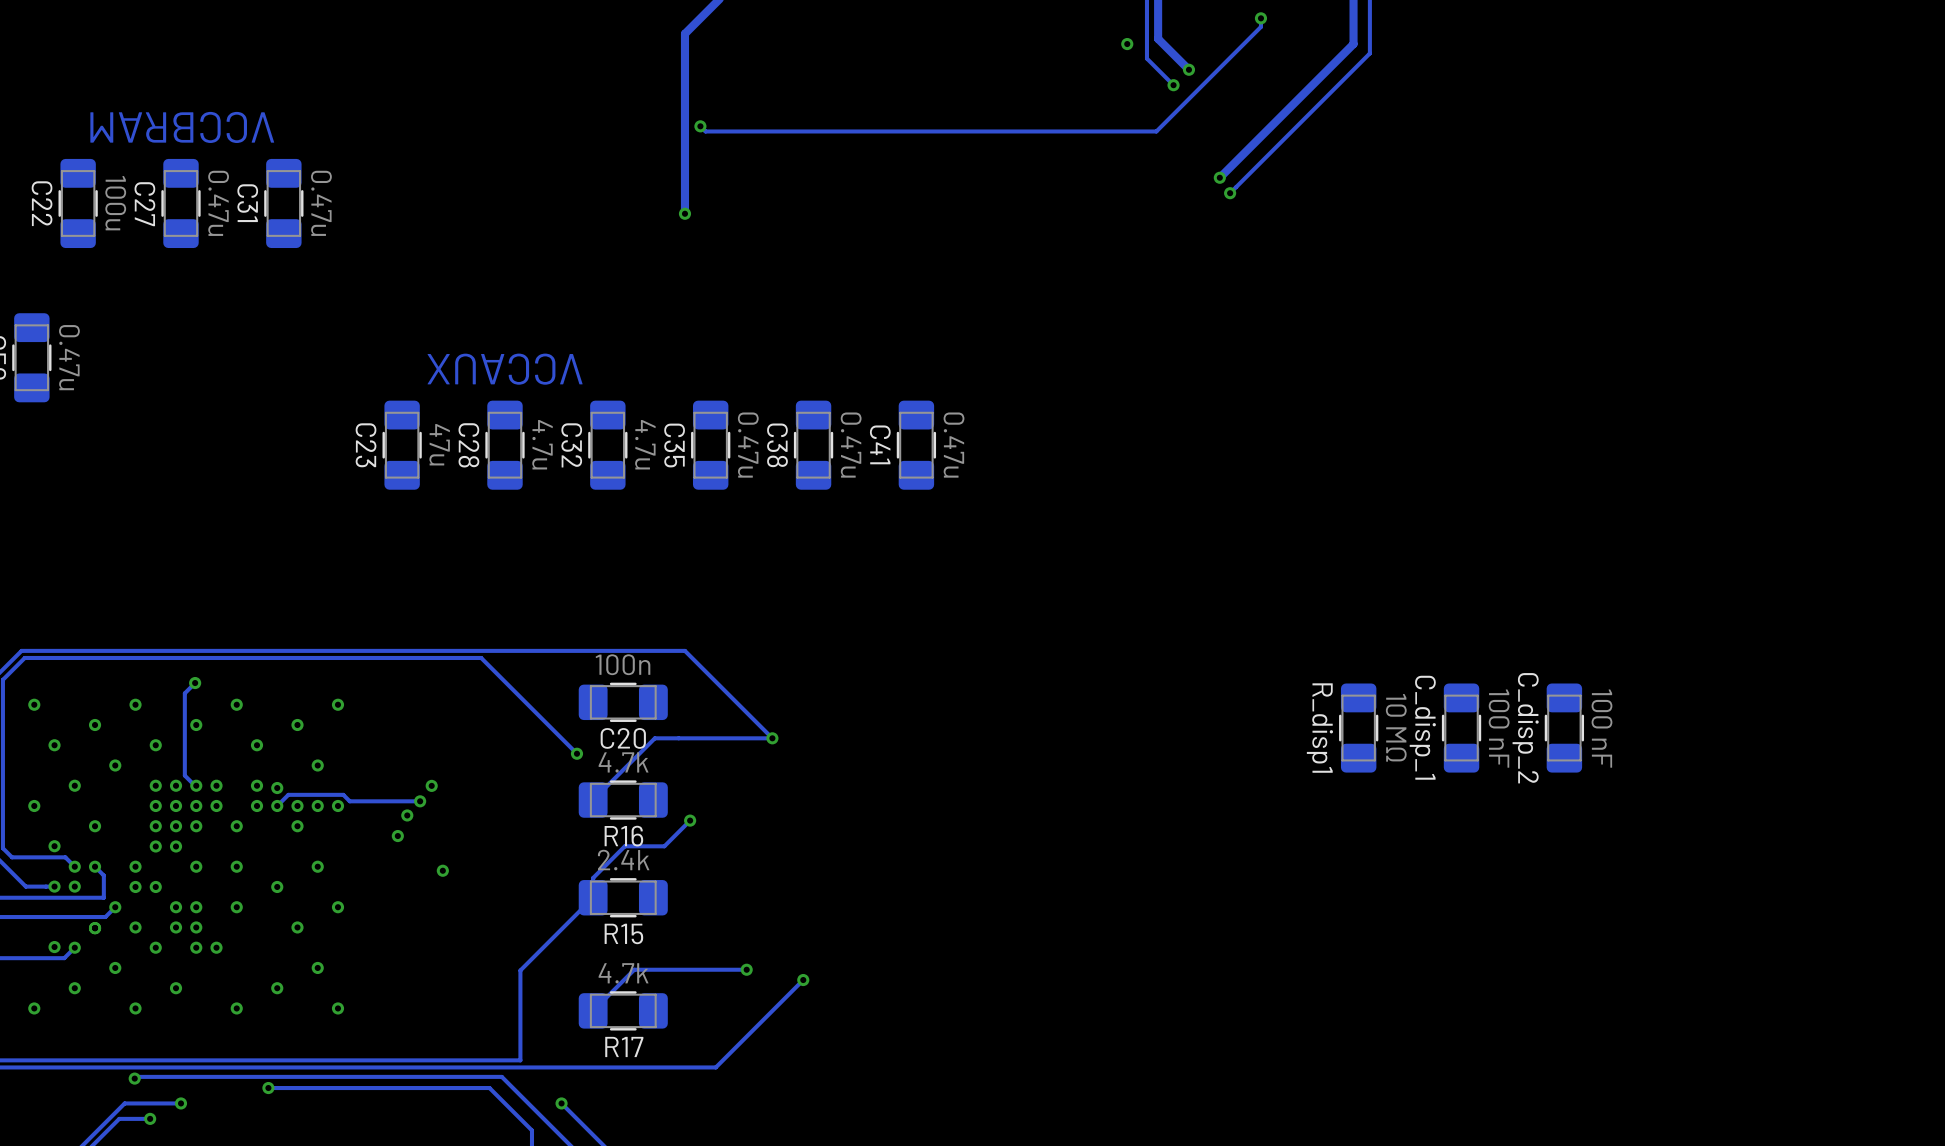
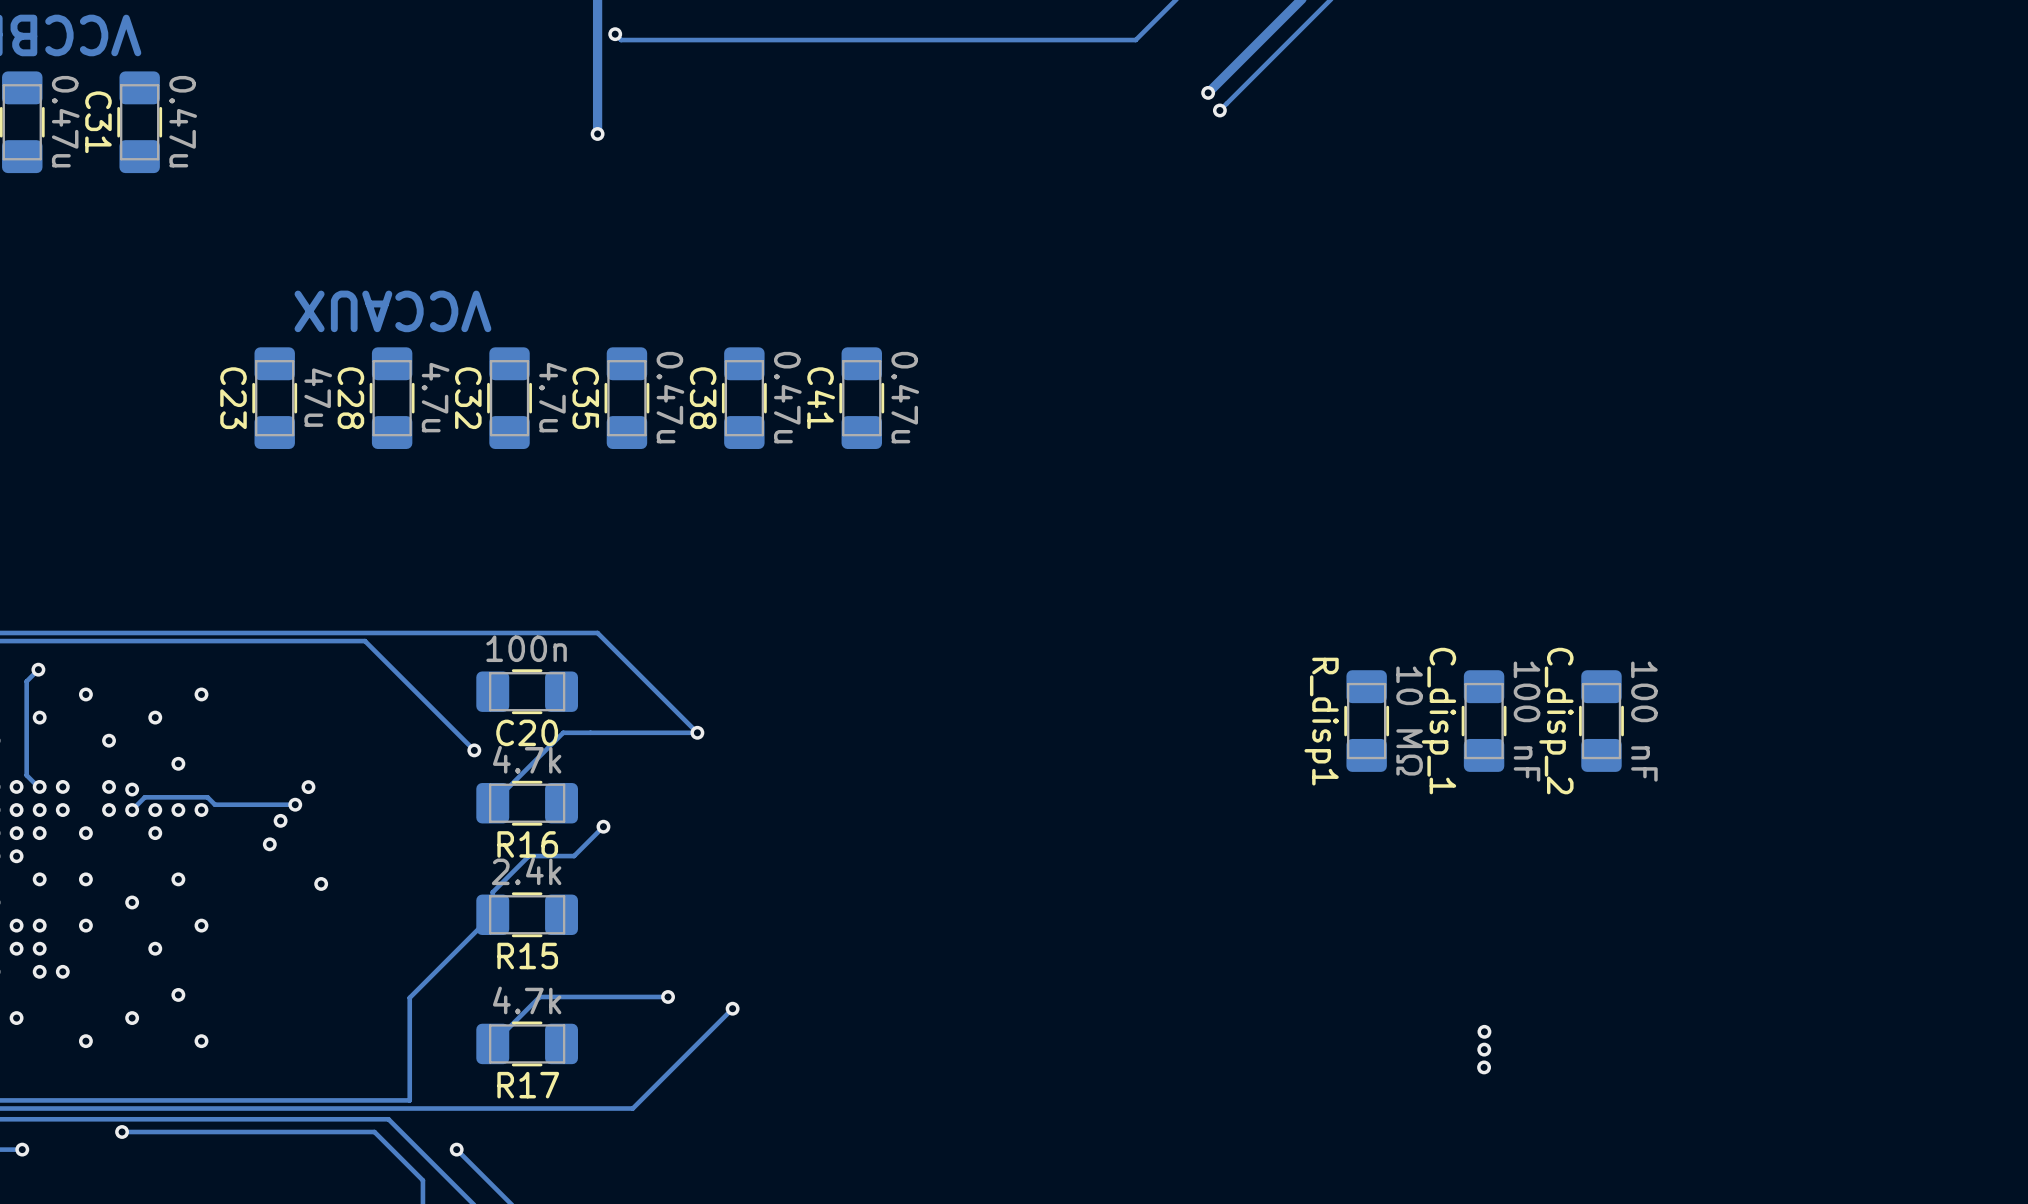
via: none -> (1484, 1031)
via: none -> (1484, 1049)
via: none -> (1484, 1067)

